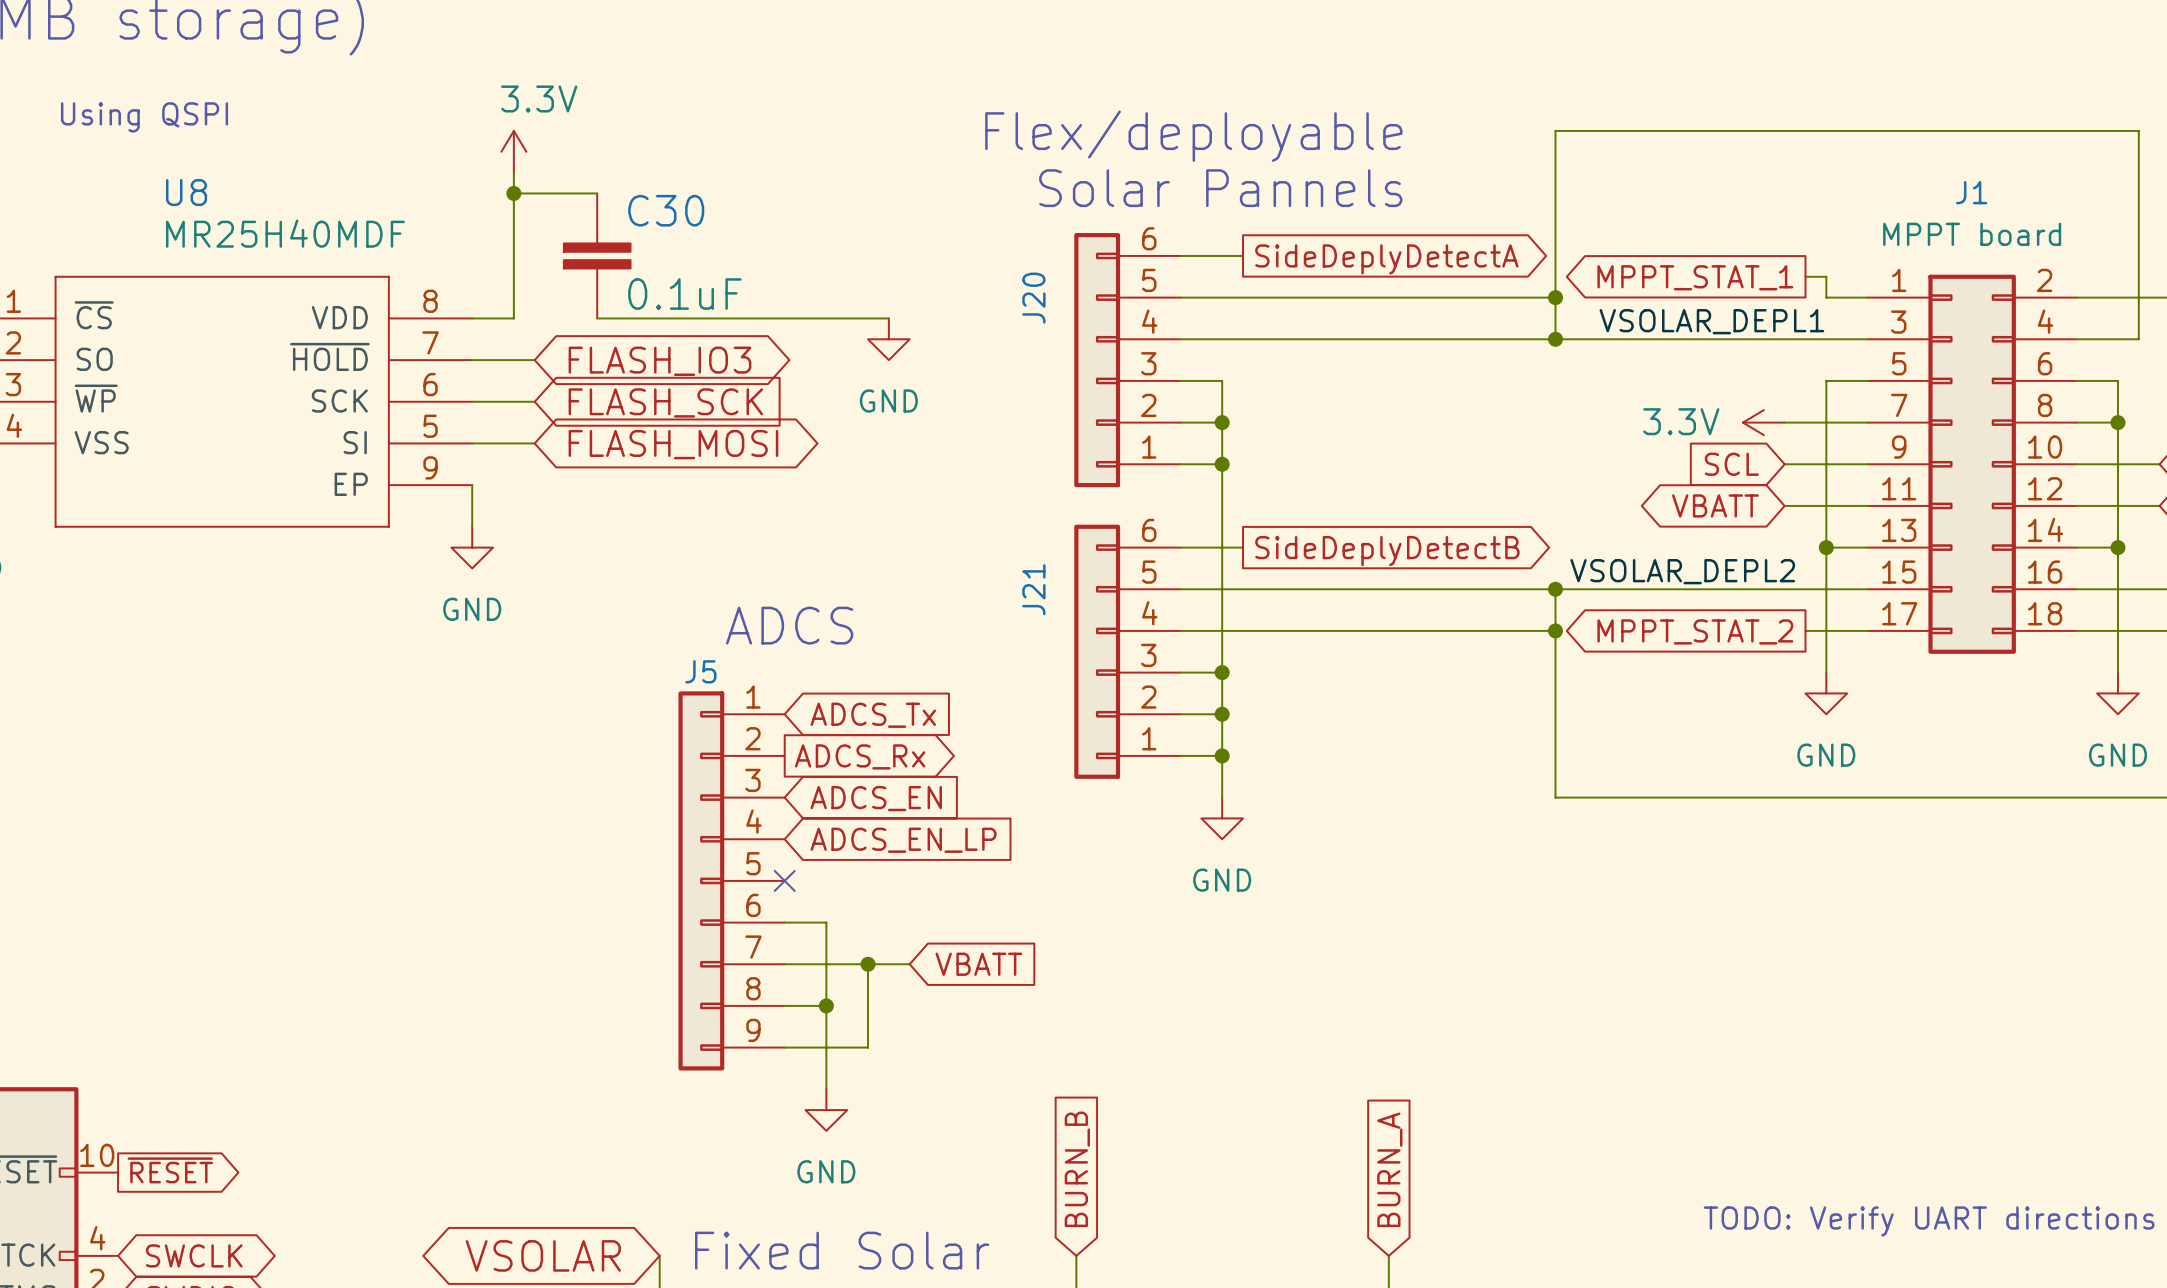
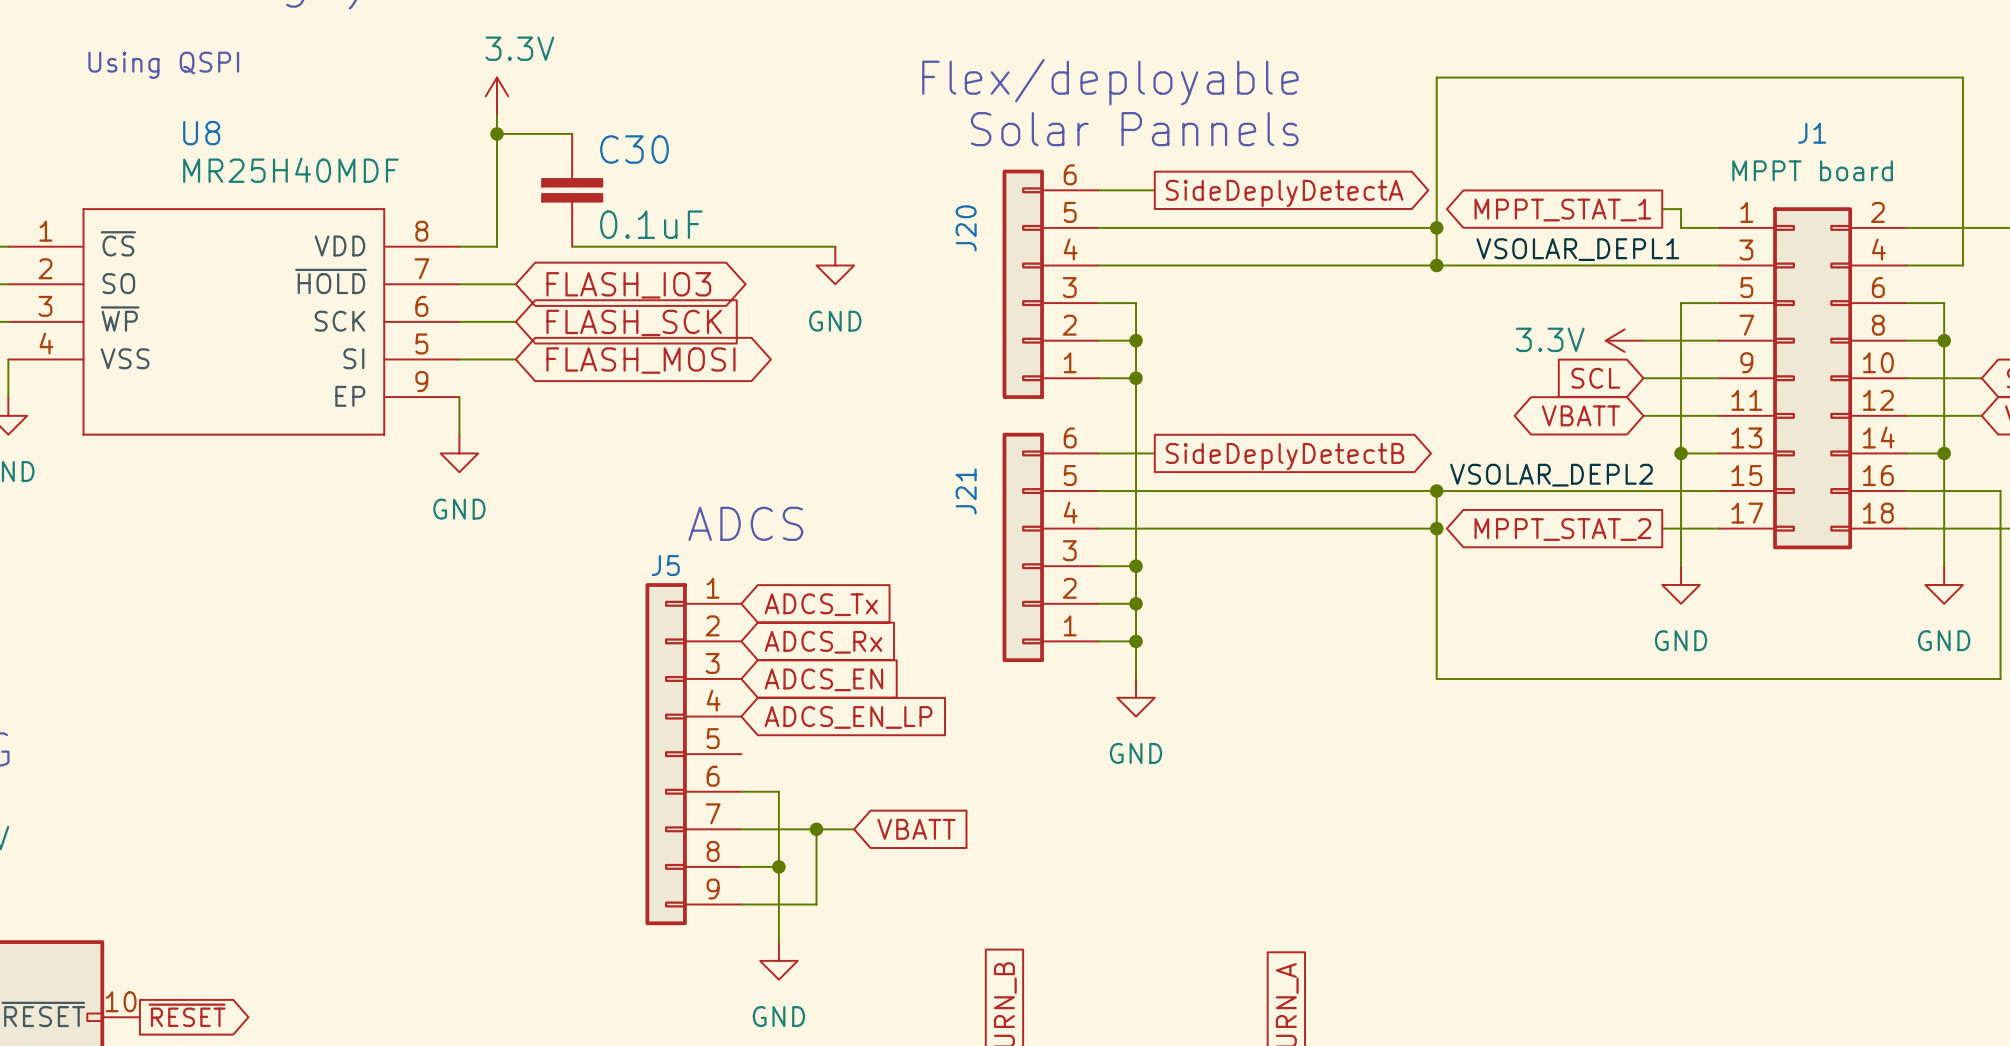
global label shape: output (860, 756) -> input (823, 642)
no-connect mark: (784, 880) -> none

